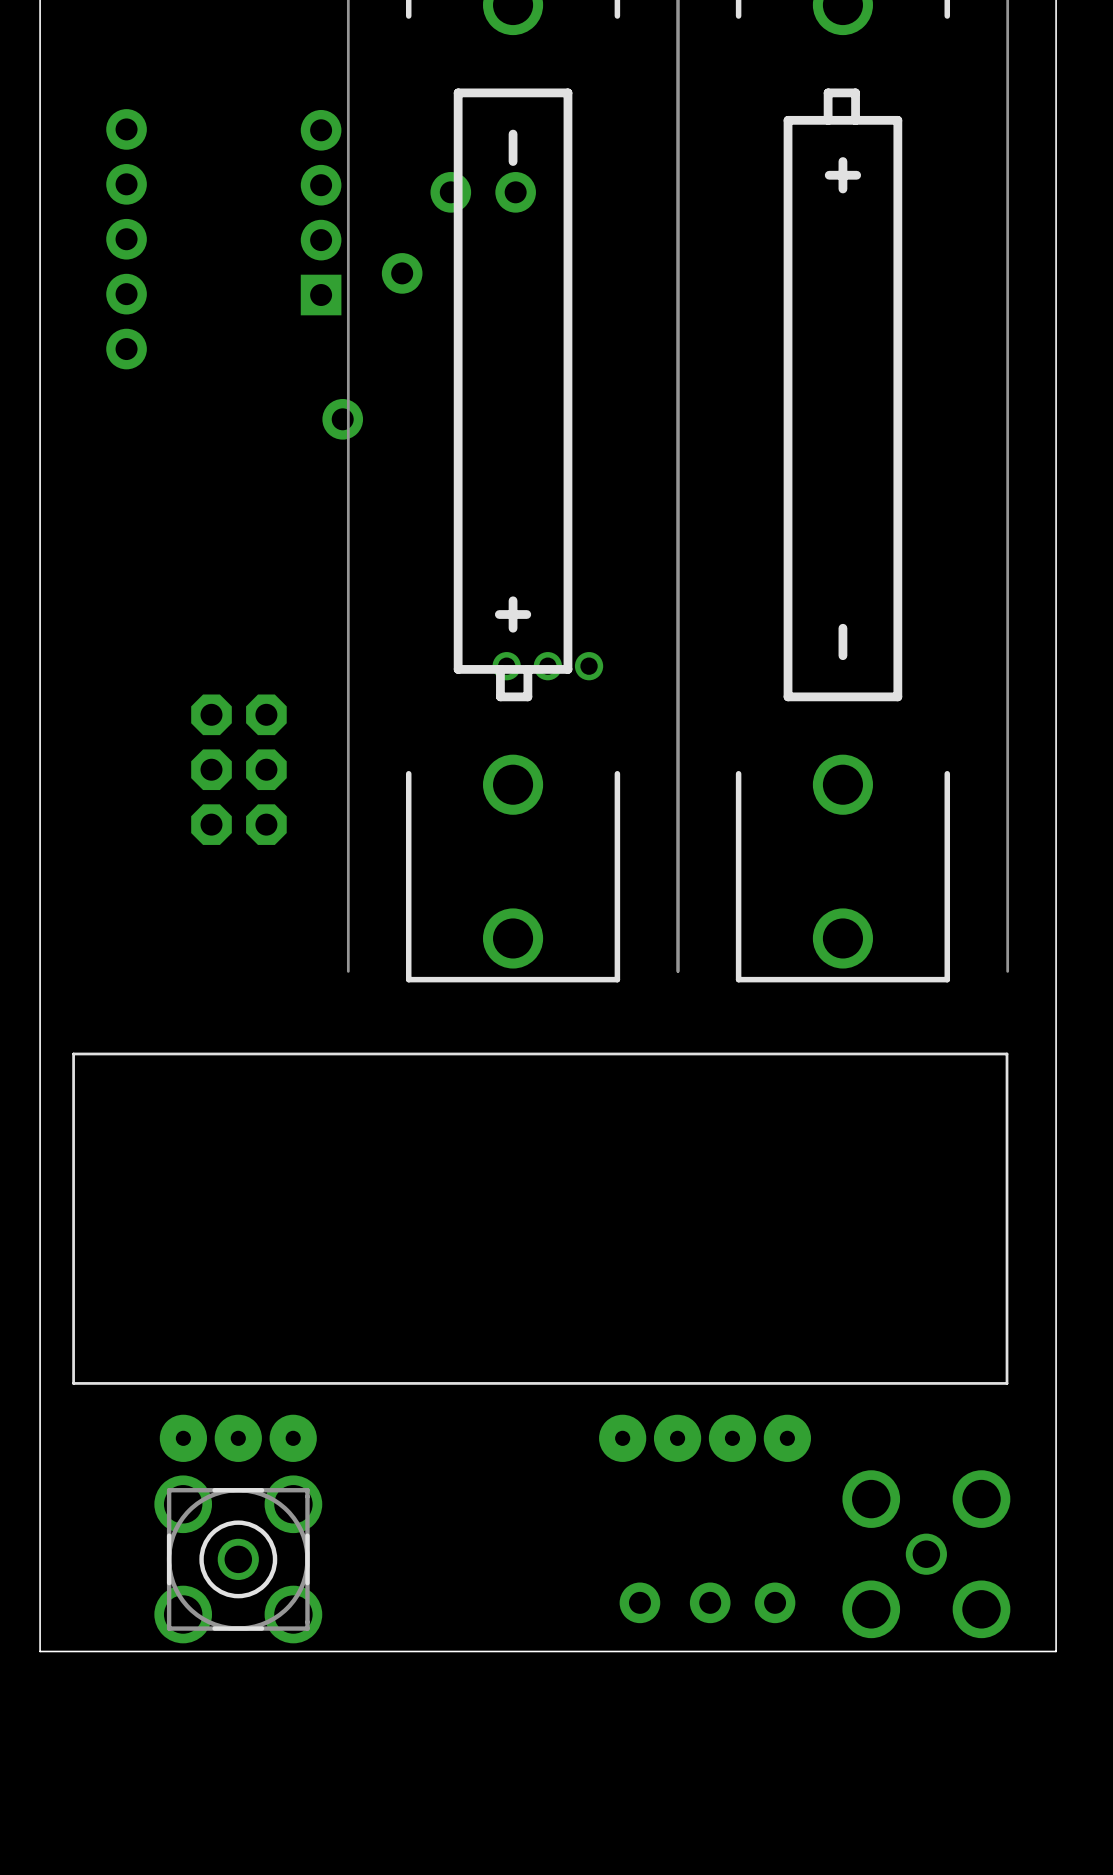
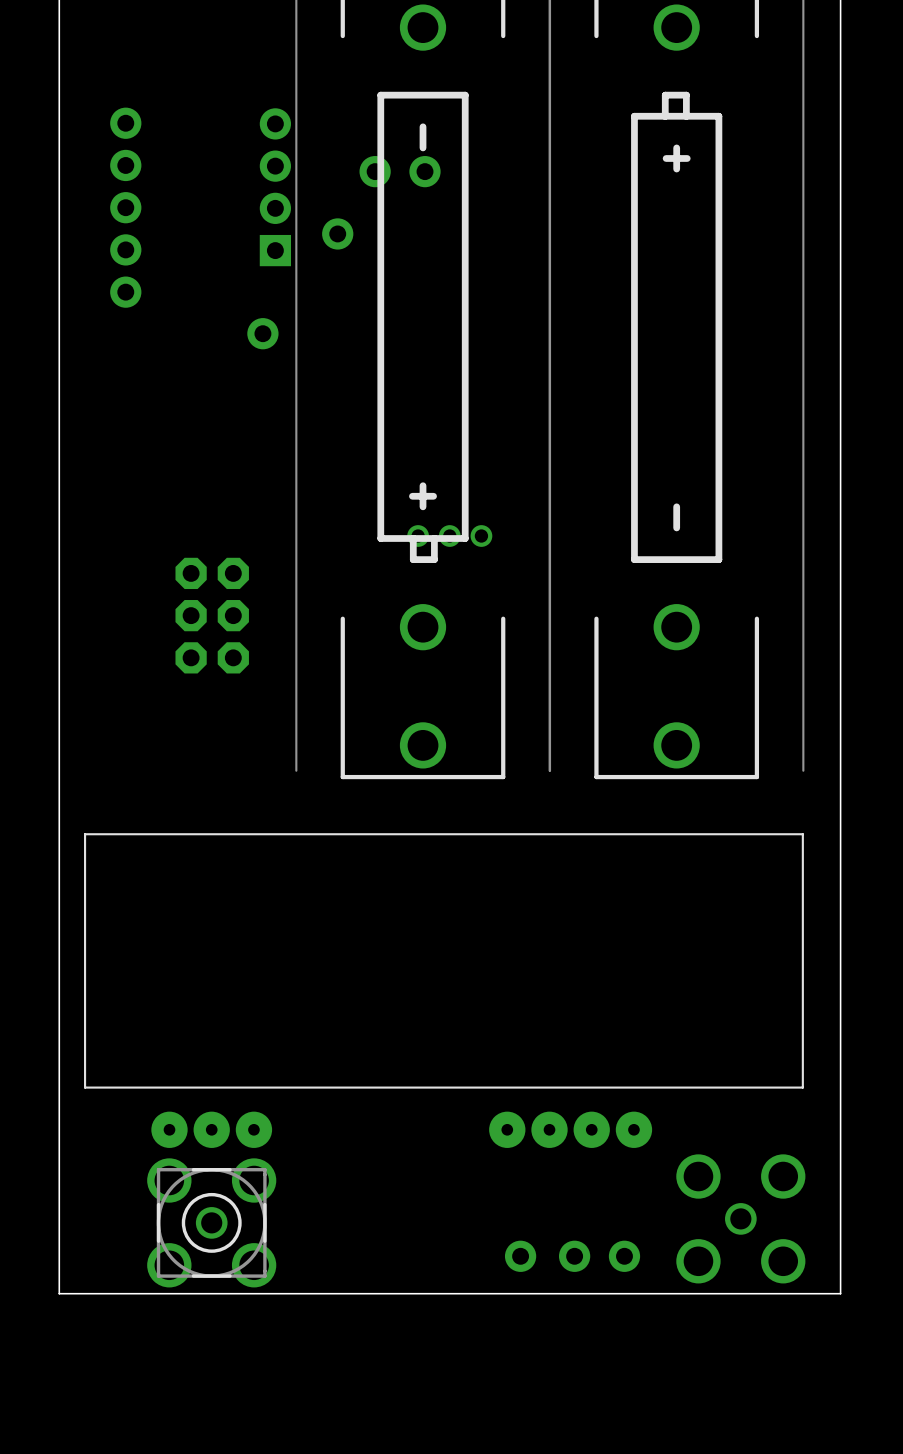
part position: (342, 419) -> (262, 333)

